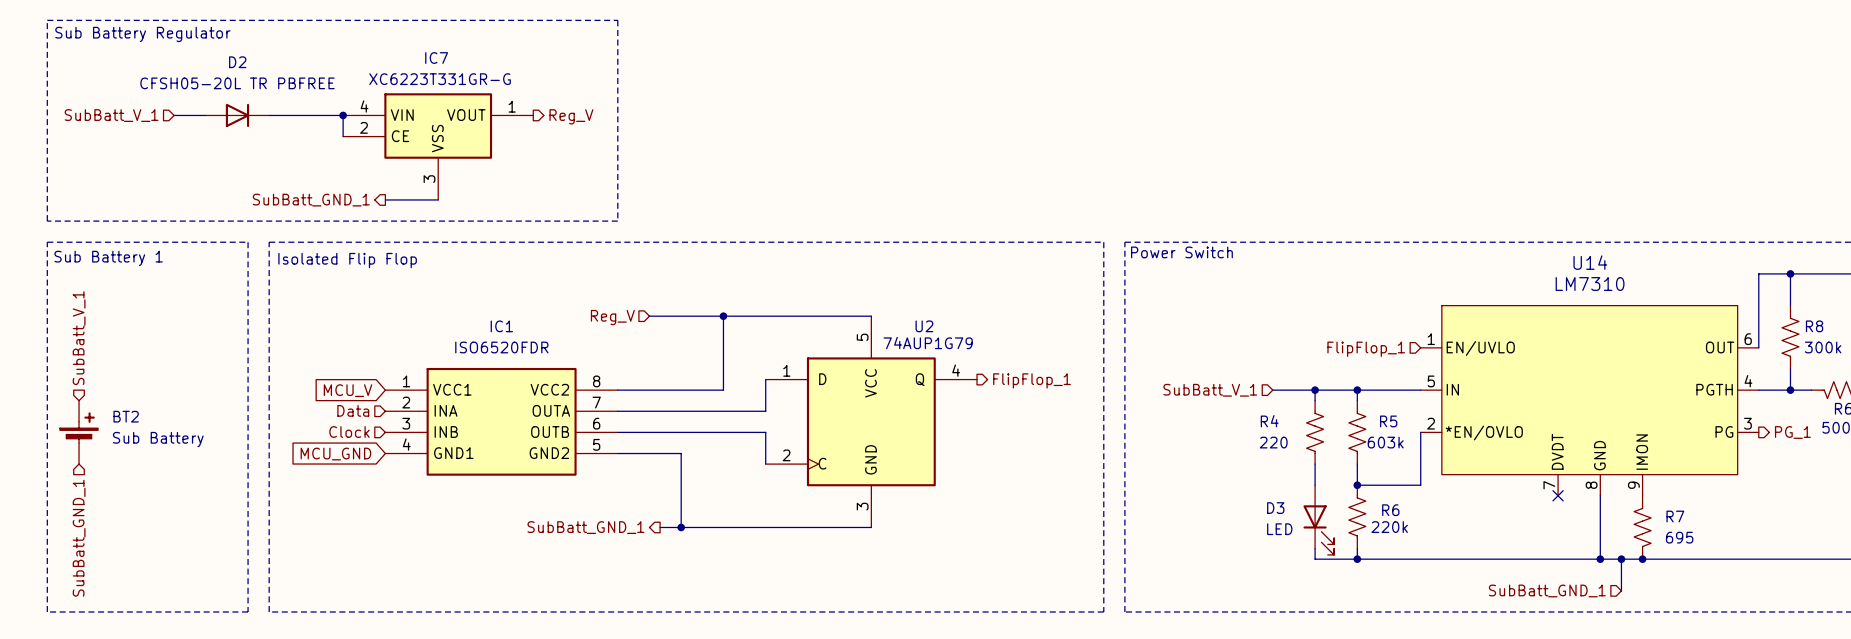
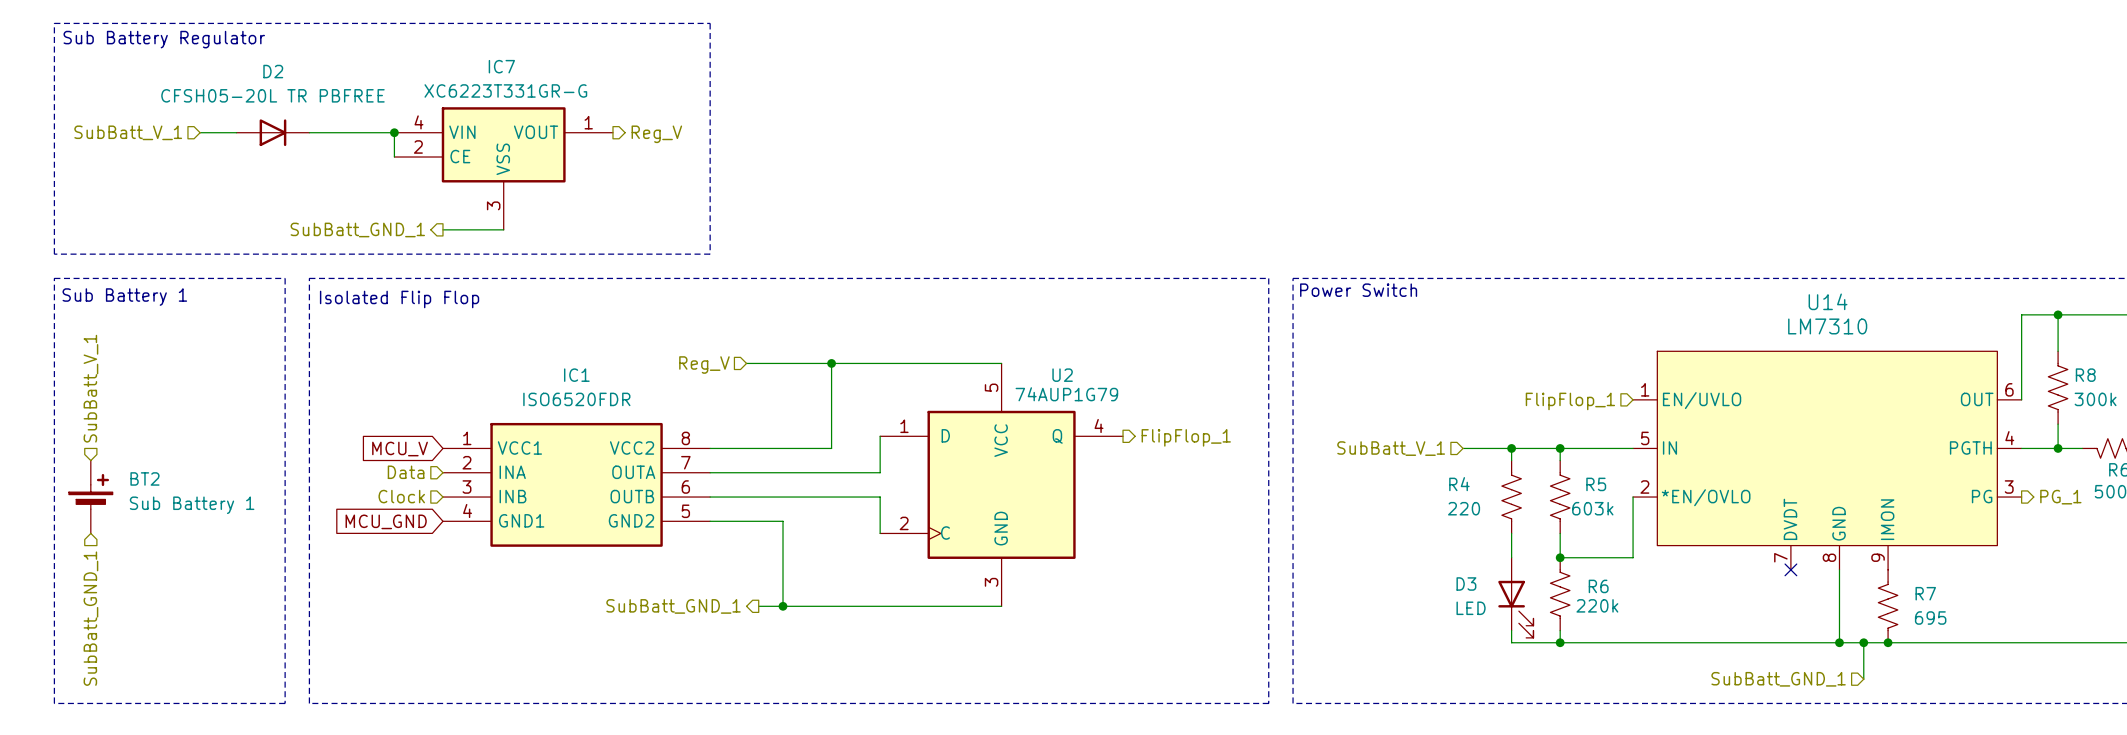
BT2 value: Sub Battery (158, 439) -> Sub Battery 1 (192, 505)

